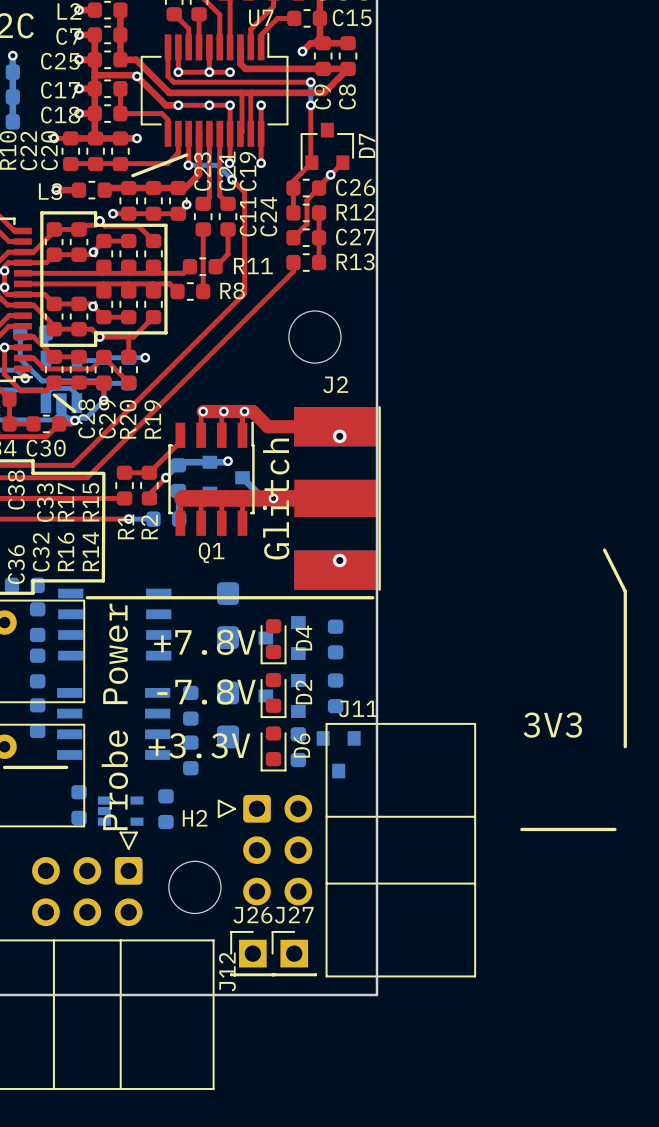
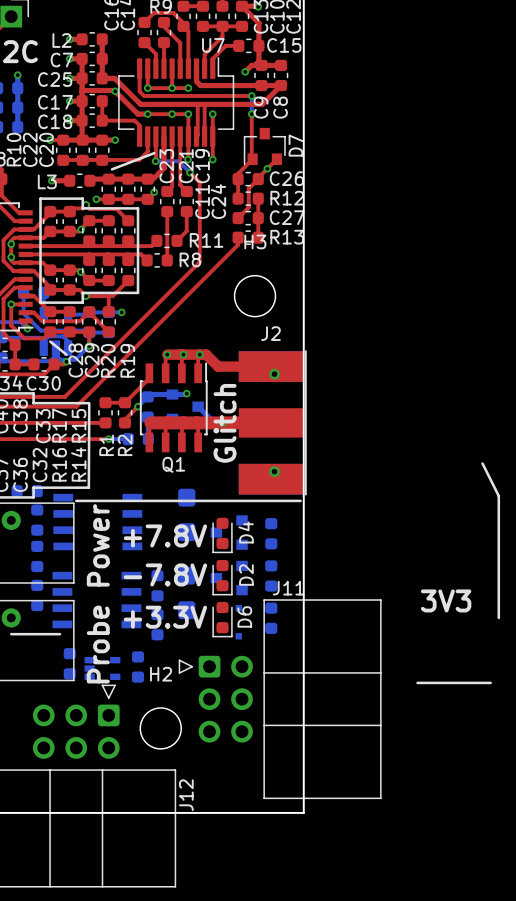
H3 name: none -> H3 (255, 241)
part footprint: [290, 727, 307, 768] -> [235, 604, 242, 640]
part footprint: [316, 731, 361, 779] -> [265, 602, 278, 634]
J26: (252, 953) -> none
J27: (294, 953) -> none

